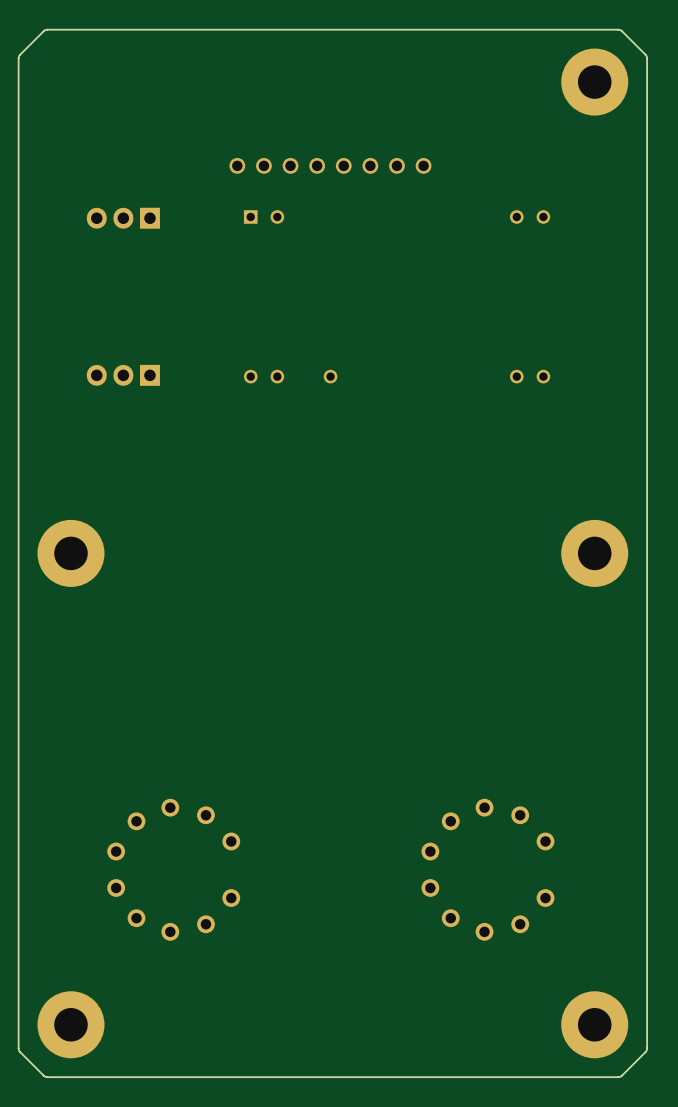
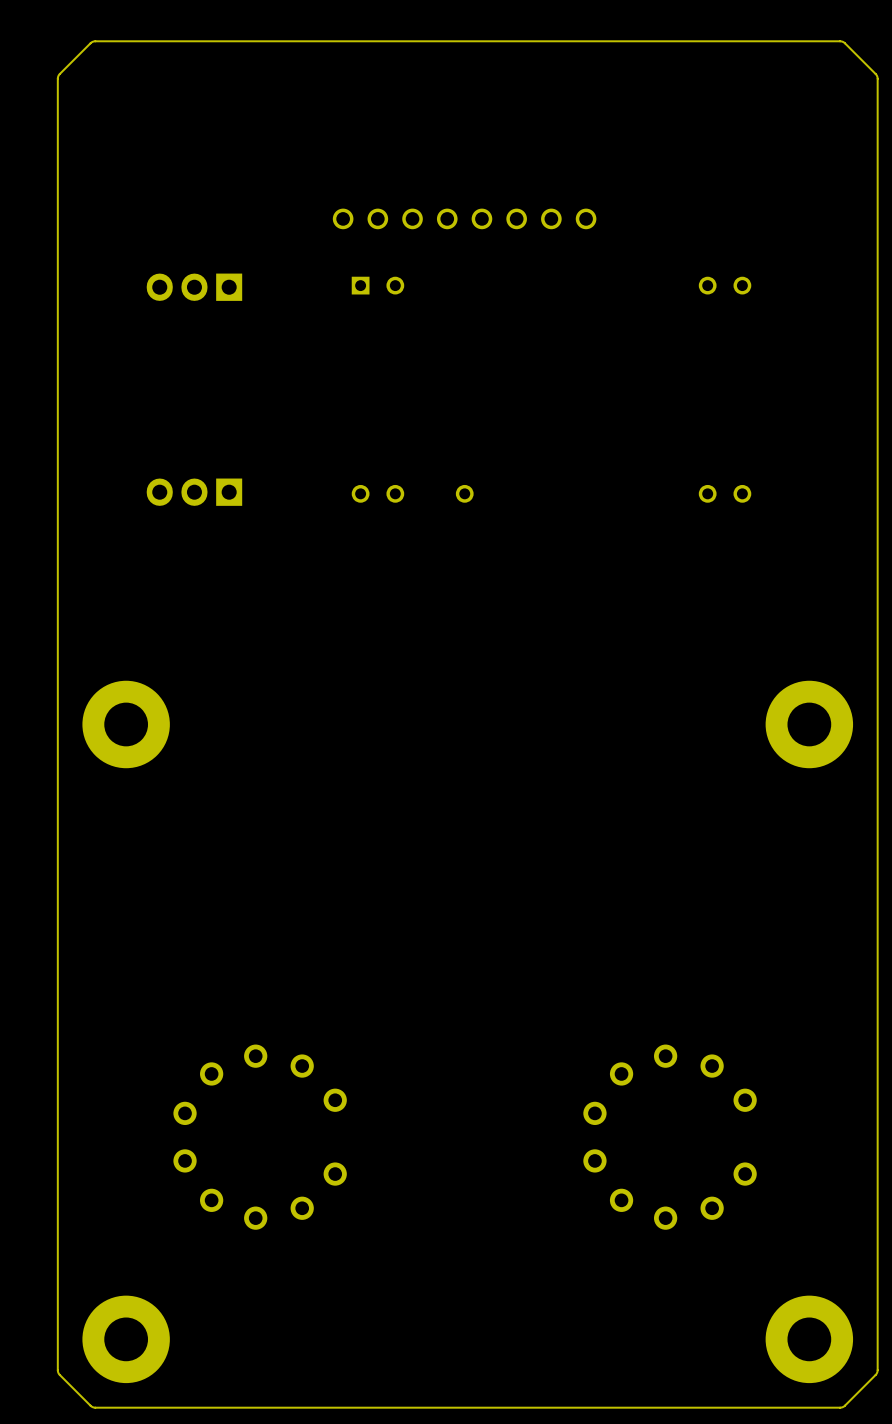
part: (594, 82) -> none

